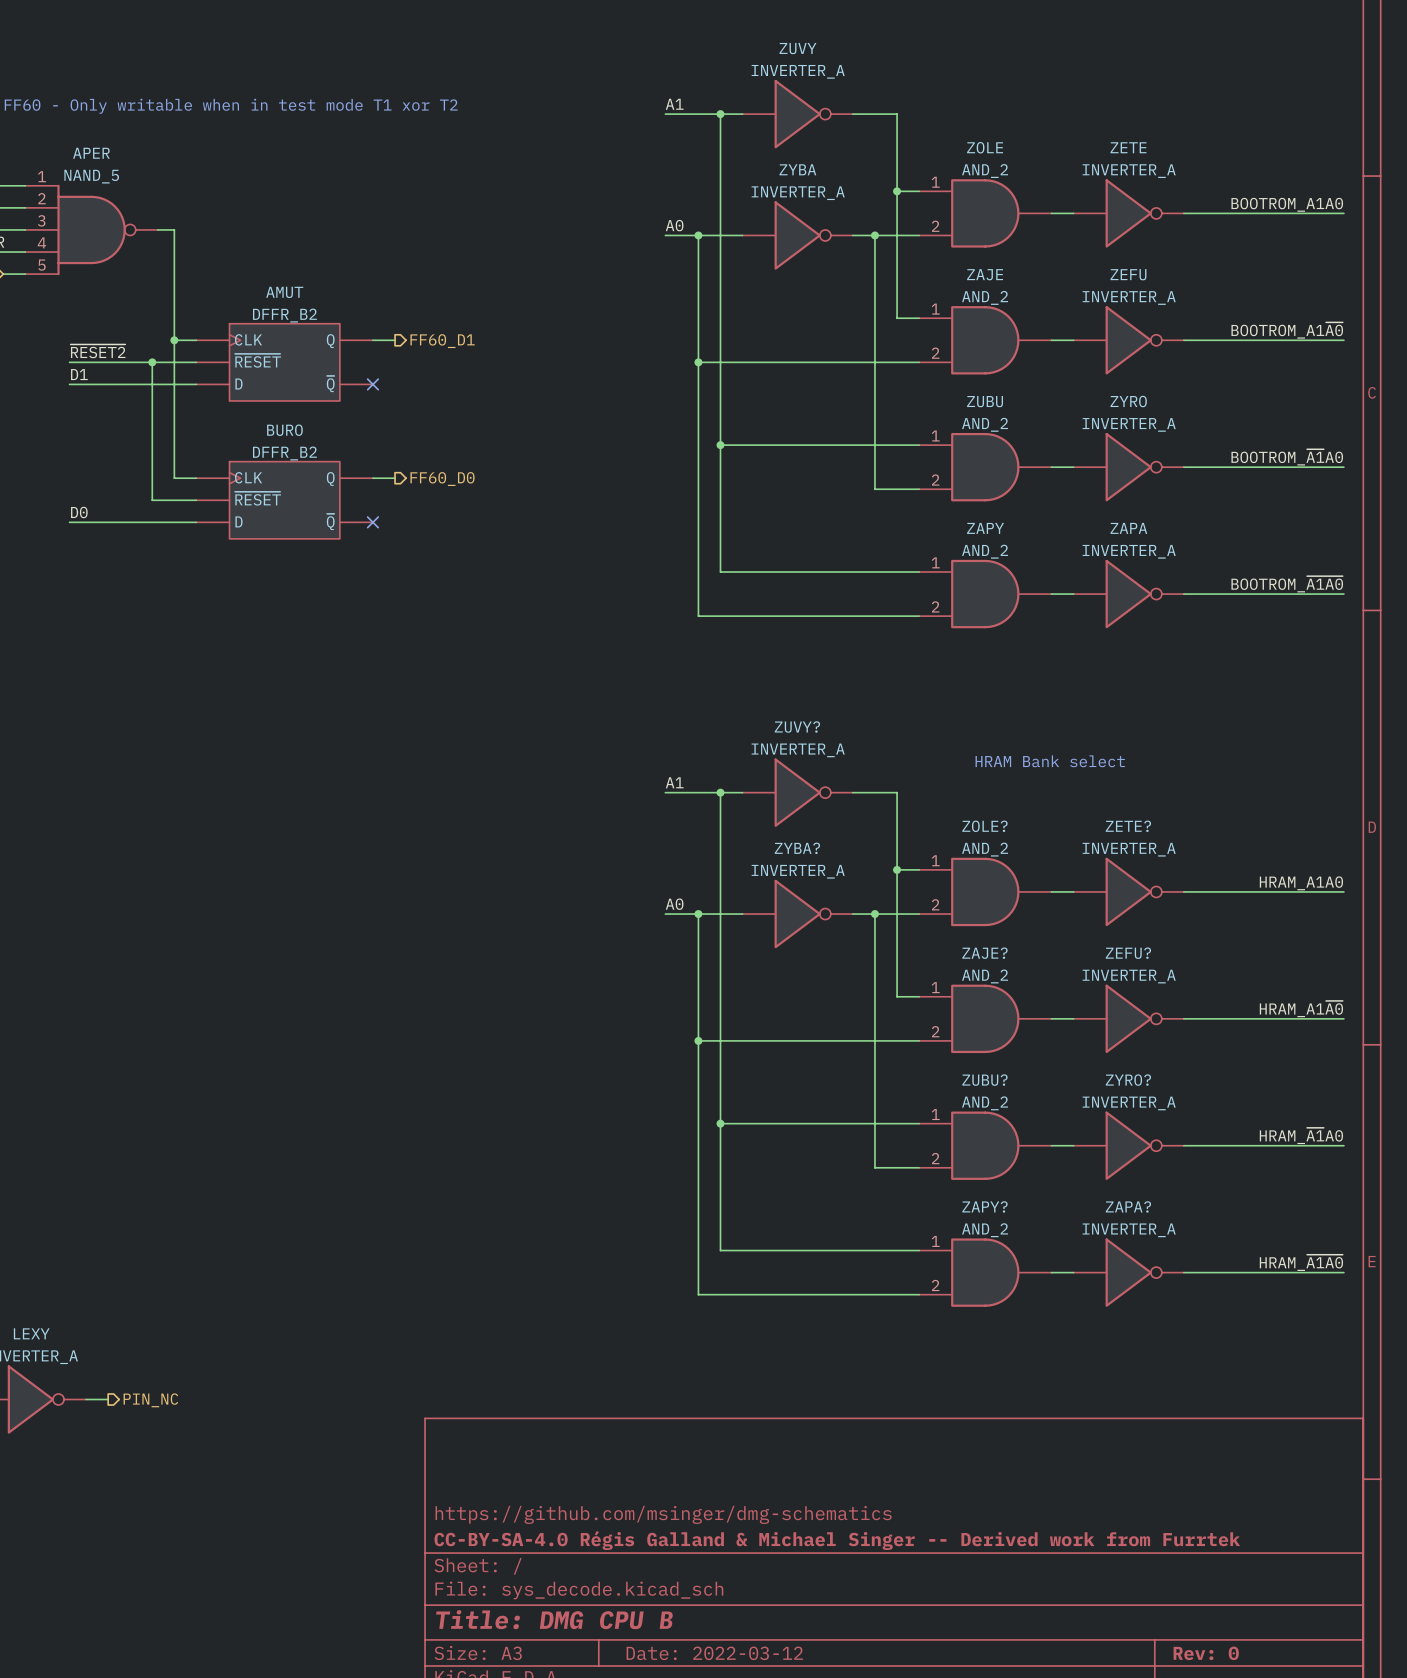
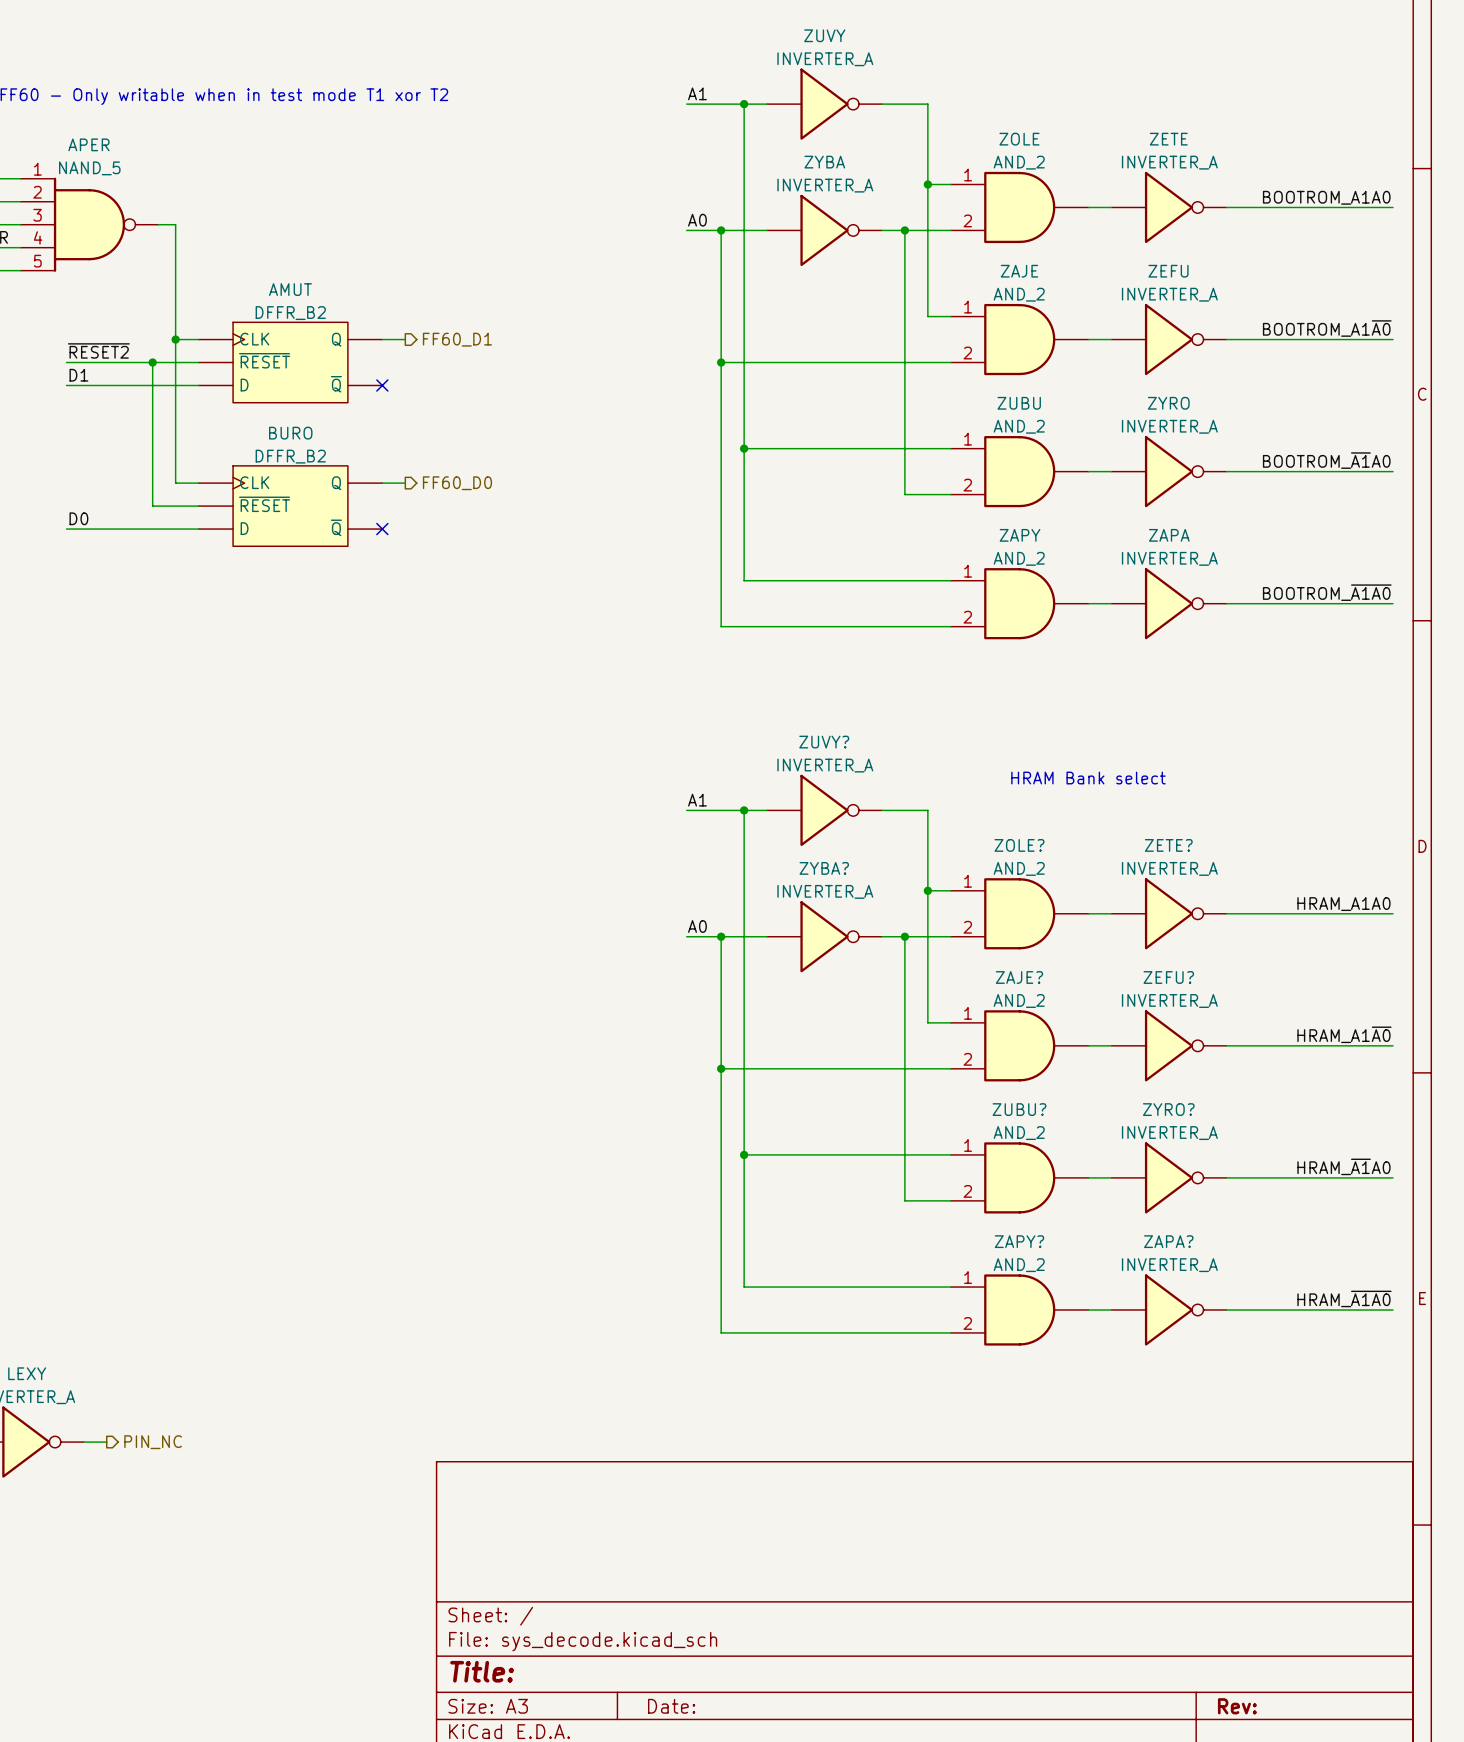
title block: https://github.com/msinger/dmg-schematics (663, 1514) -> none
title block: CC-BY-SA-4.0 Régis Galland & Michael Singer -- Derived work from Furrtek (837, 1540) -> none
title block: Title: DMG CPU B (554, 1619) -> Title: (482, 1671)
title block: Date: 2022-03-12 (714, 1653) -> Date: (671, 1706)
title block: Rev: 0 (1206, 1653) -> Rev: (1237, 1706)

